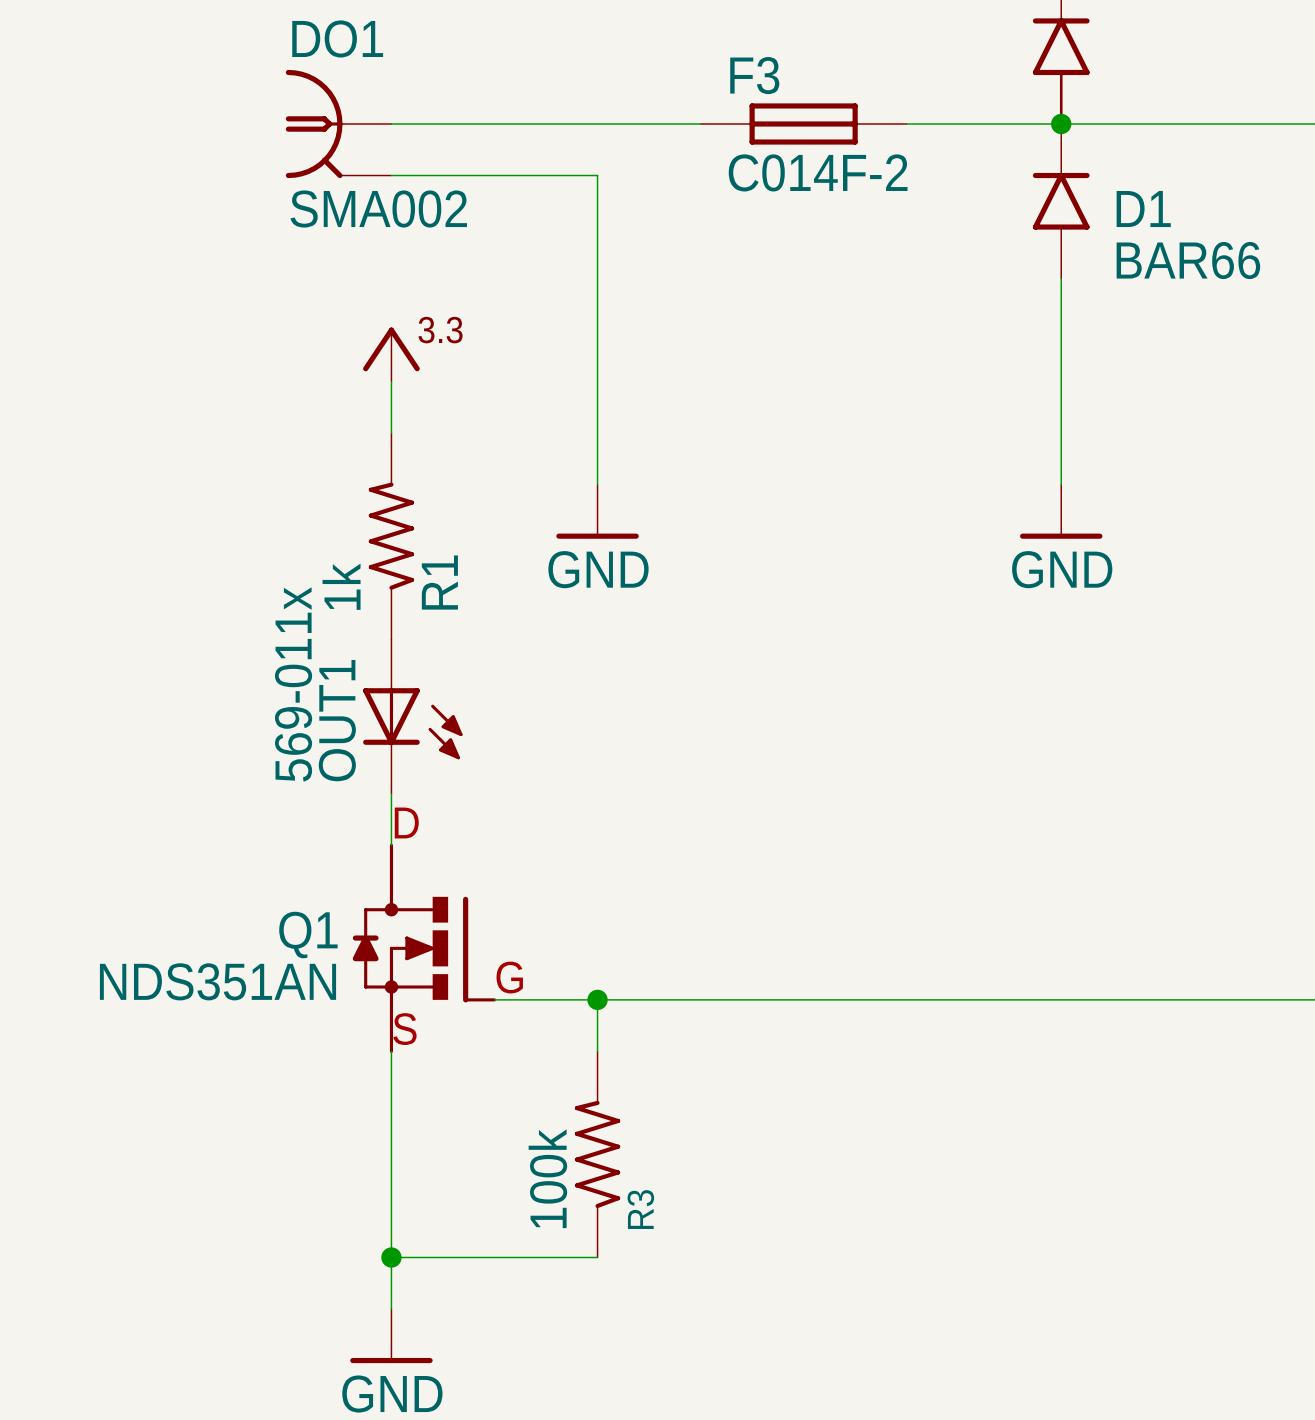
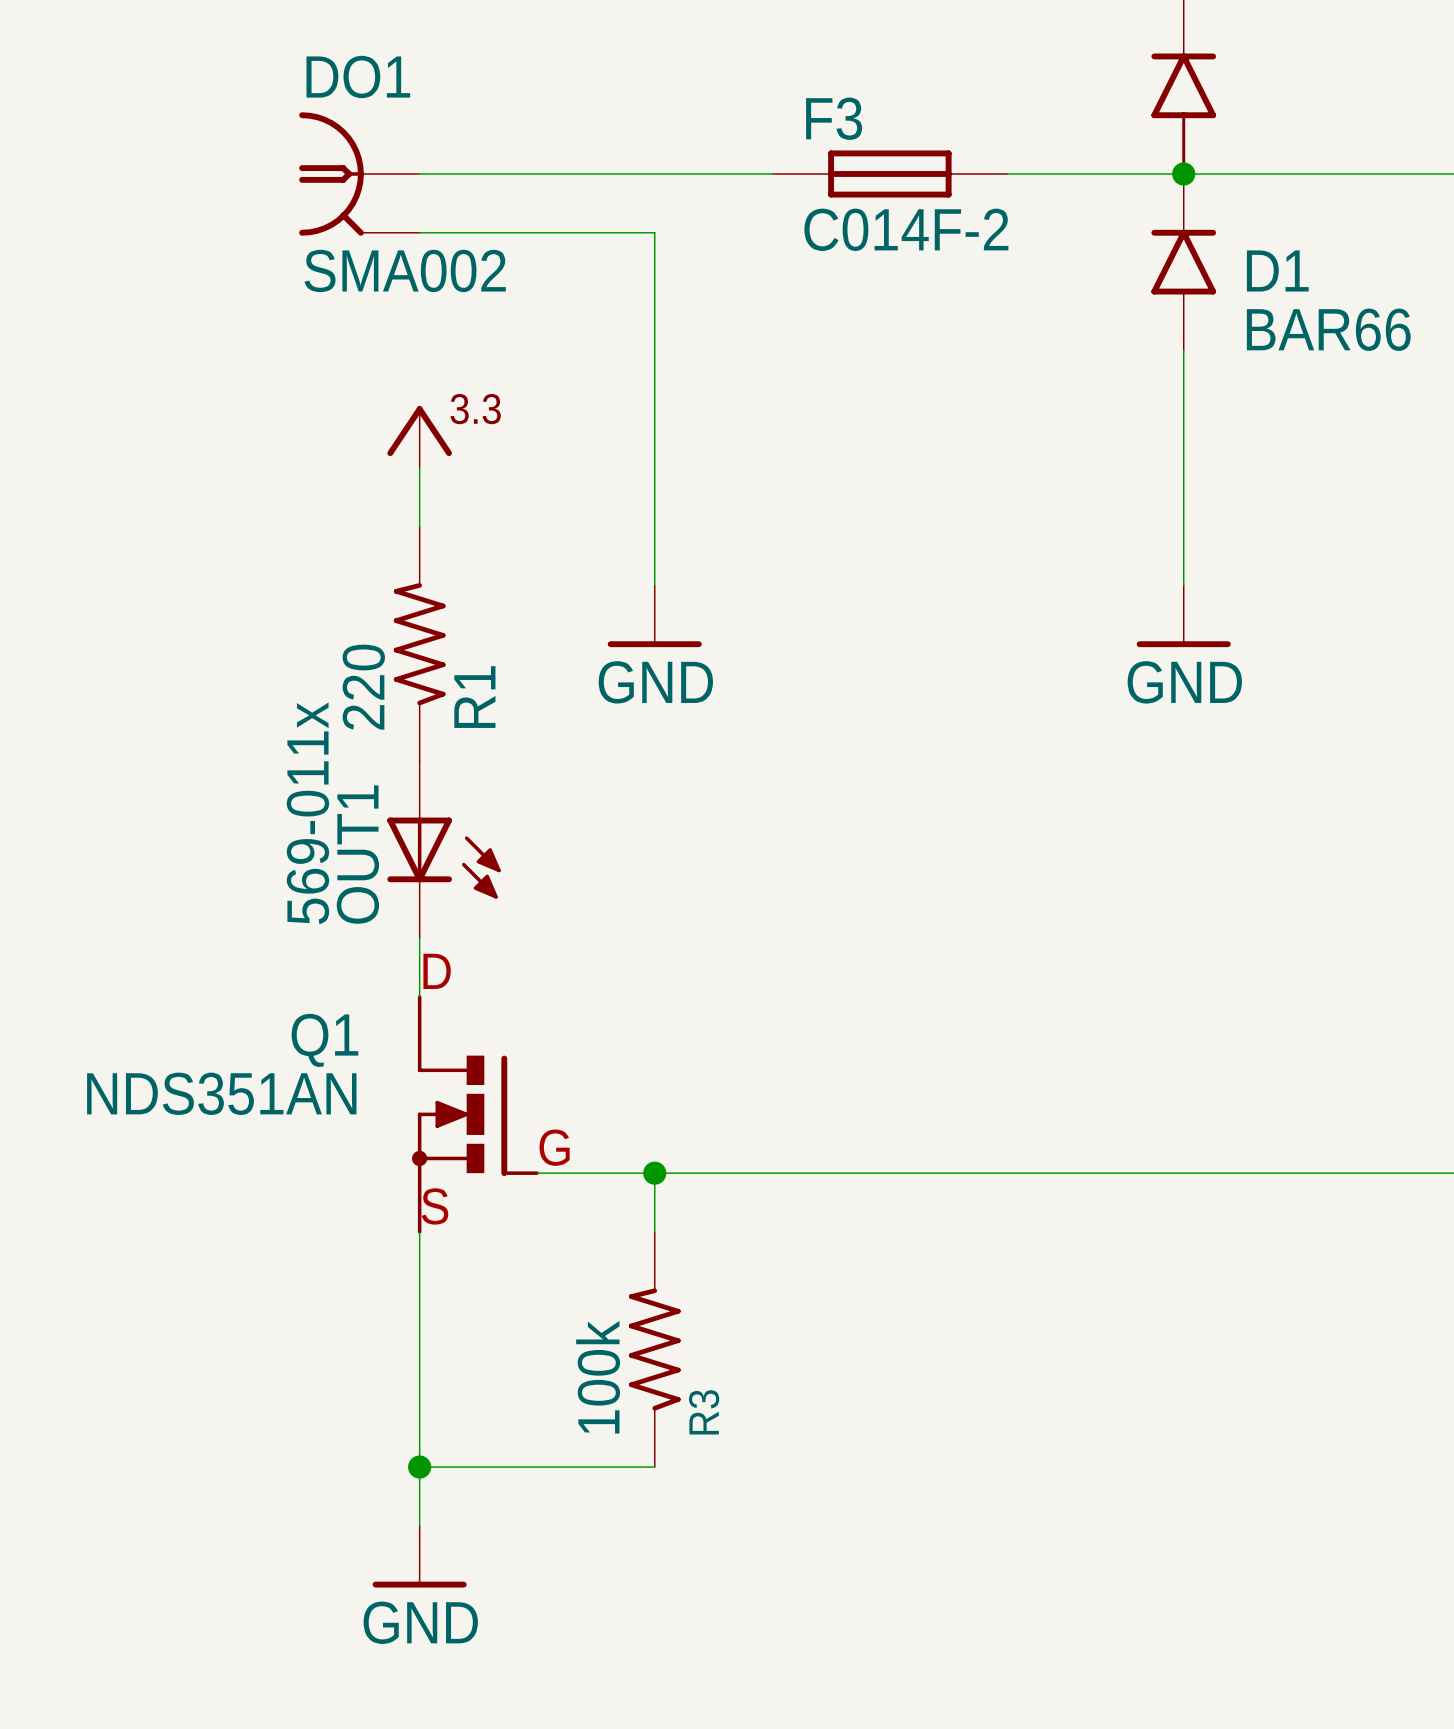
R1 value: 1k (341, 586) -> 220 (363, 687)
Q1 symbol: [352, 843, 497, 1053] -> [412, 995, 539, 1234]
Q1 name position: Q1 (308, 935) -> Q1 (324, 1040)
Q1 value position: NDS351AN (218, 981) -> NDS351AN (221, 1093)

